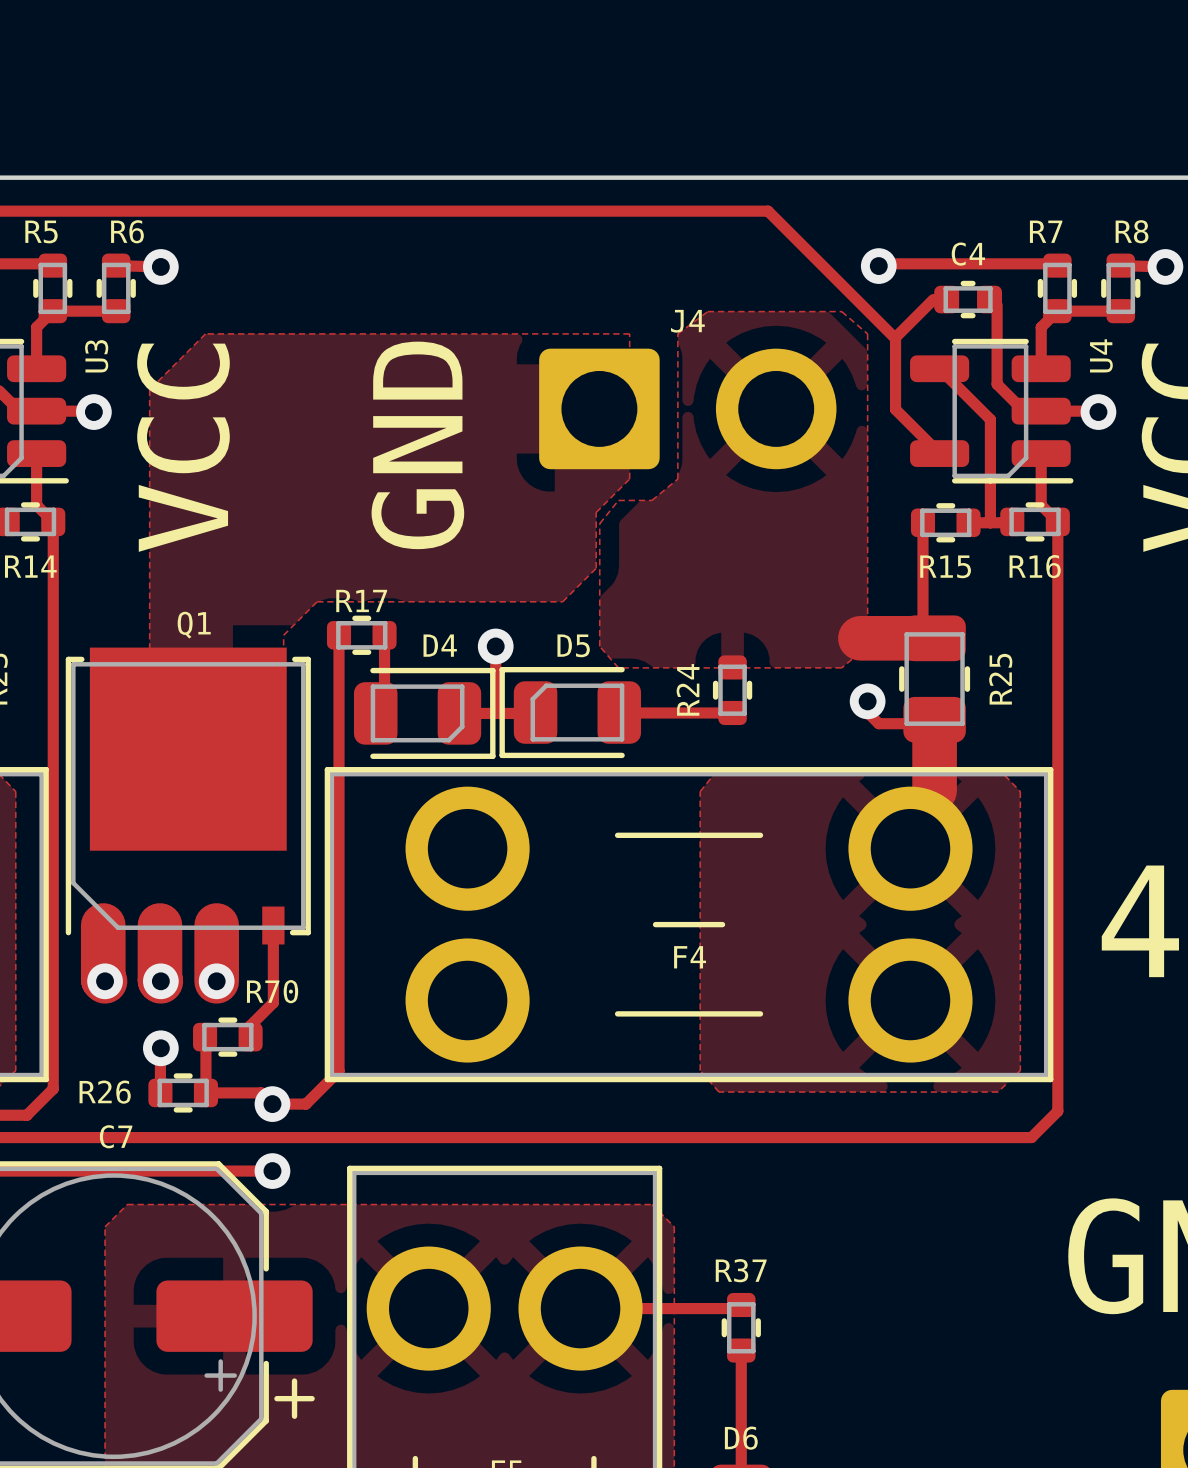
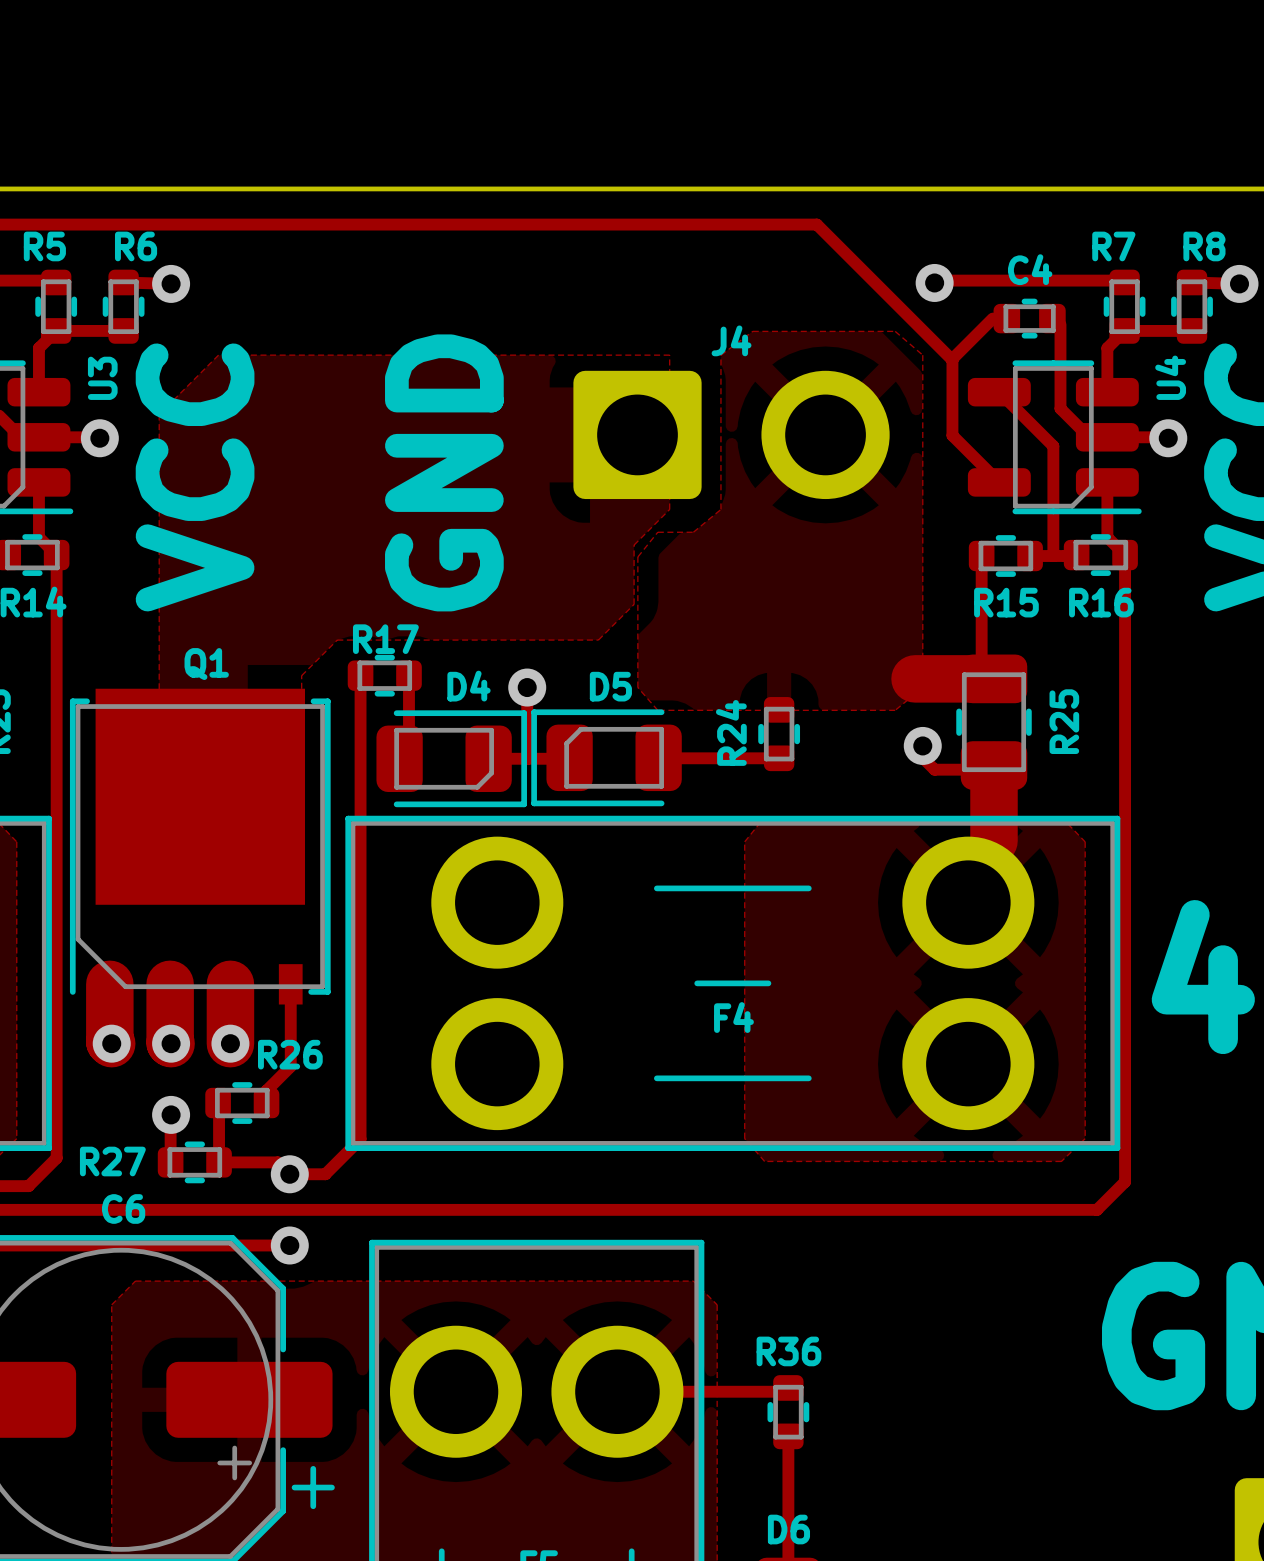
R70 name: R70 (272, 991) -> R26 (290, 1054)
R26 name: R26 (105, 1092) -> R27 (112, 1161)
C7 name: C7 (116, 1136) -> C6 (123, 1208)
R37 name: R37 (741, 1270) -> R36 (788, 1351)

